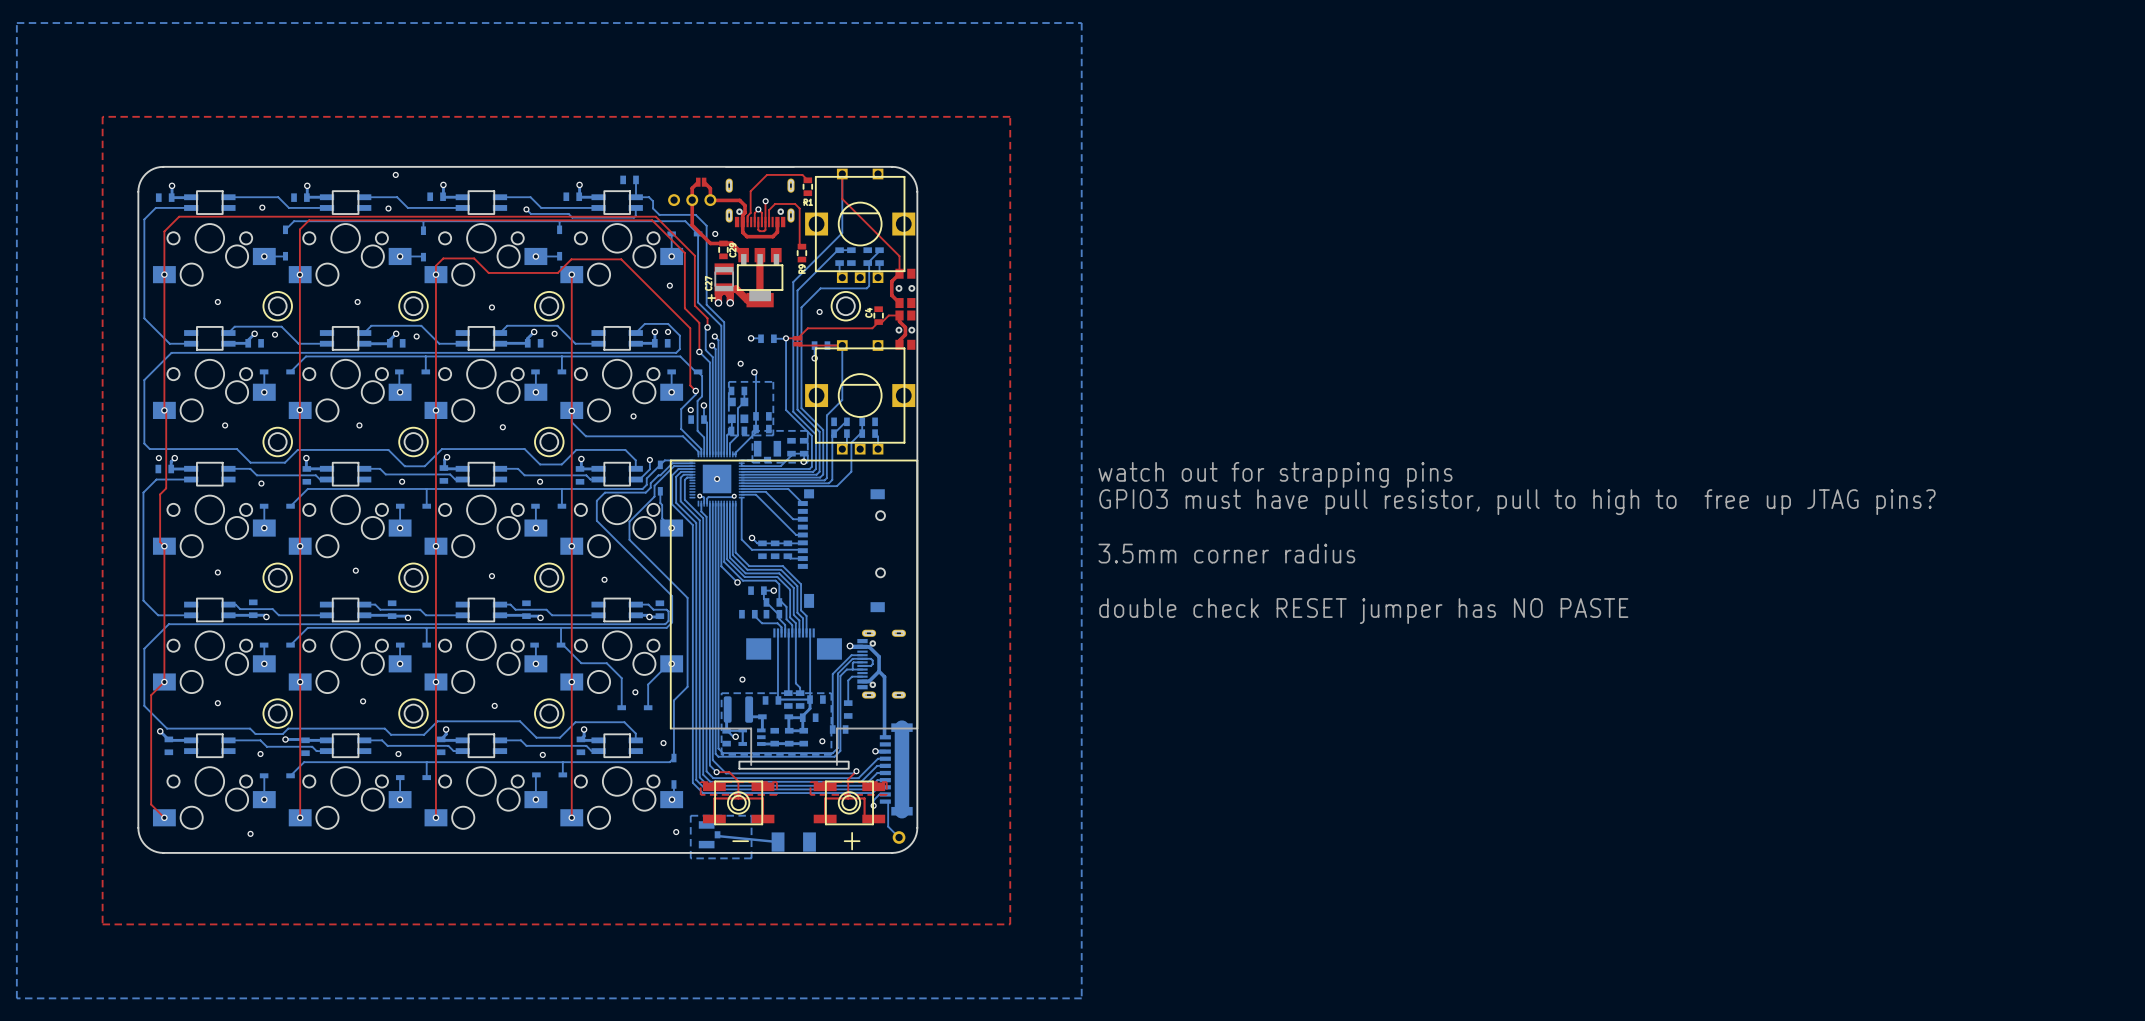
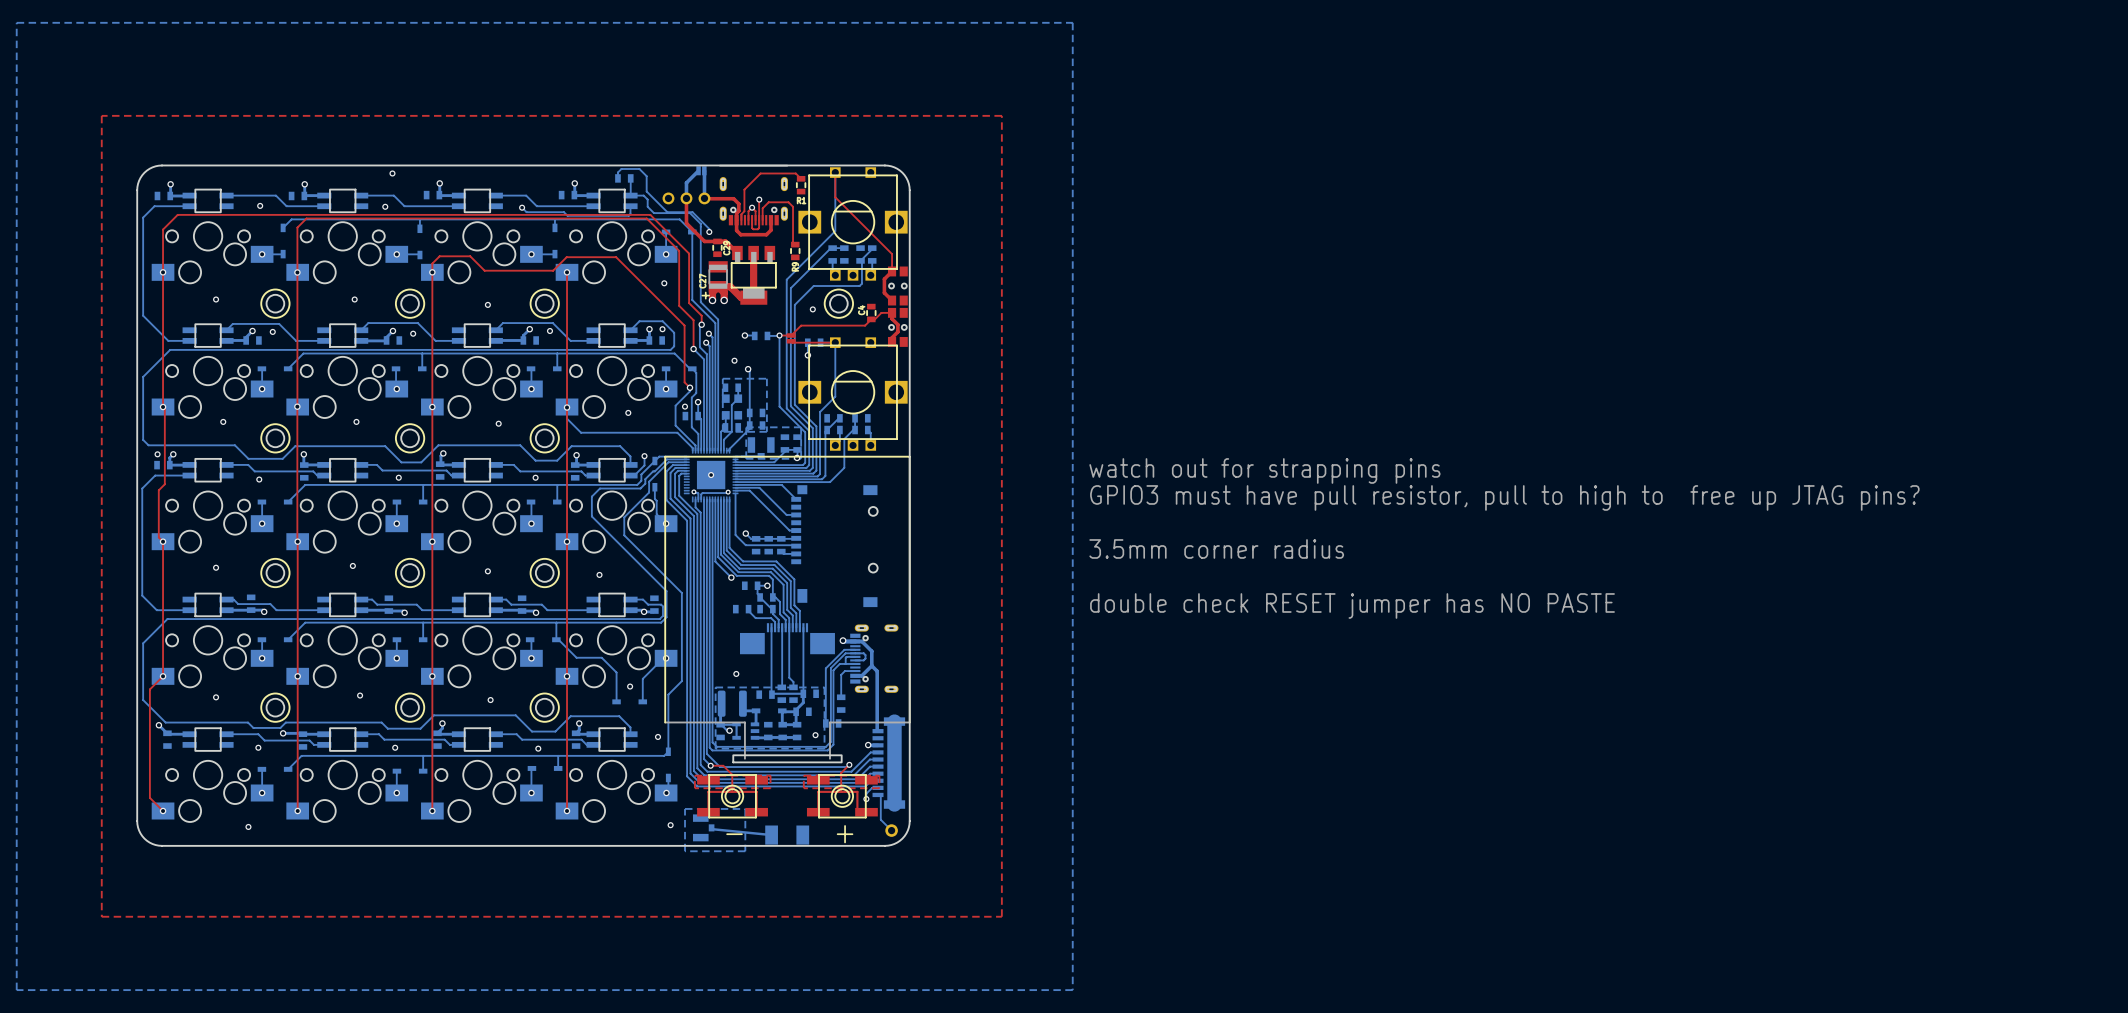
bottom track: none -> (698, 170) (686, 182) (686, 198)
bottom track: none -> (704, 170) (704, 198)
bottom track: none -> (617, 178) (617, 172) (621, 168) (639, 168) (646, 176) (646, 191) (667, 212) (692, 212) (709, 228) (709, 232)
top track: (698, 182) (692, 188) (692, 200) -> none
part side: top (701, 182) -> bottom (701, 170)
top track: (704, 182) (710, 188) (710, 200) -> none

